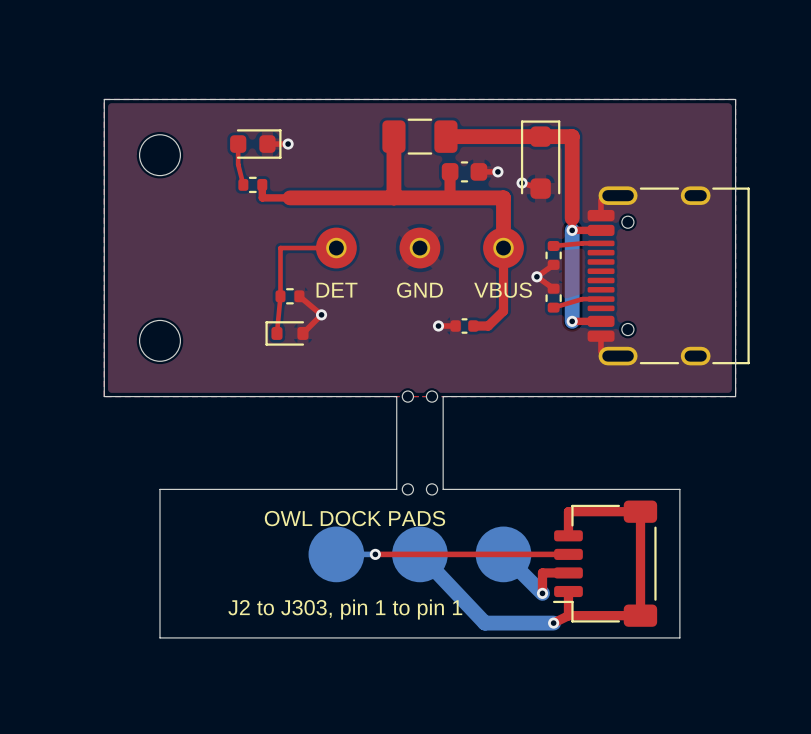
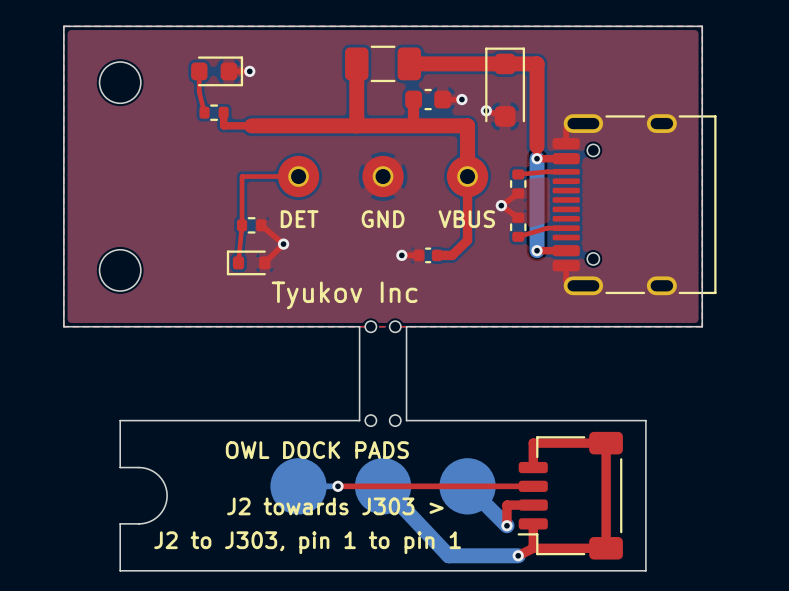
text: none -> Tyukov Inc (344, 295)
board edge: (159, 535) (159, 591) -> (120, 467) (142, 467) (153, 471) (163, 481) (167, 495) (163, 509) (153, 520) (142, 523) (120, 523)
text: none -> J2 towards J303 > (335, 506)

